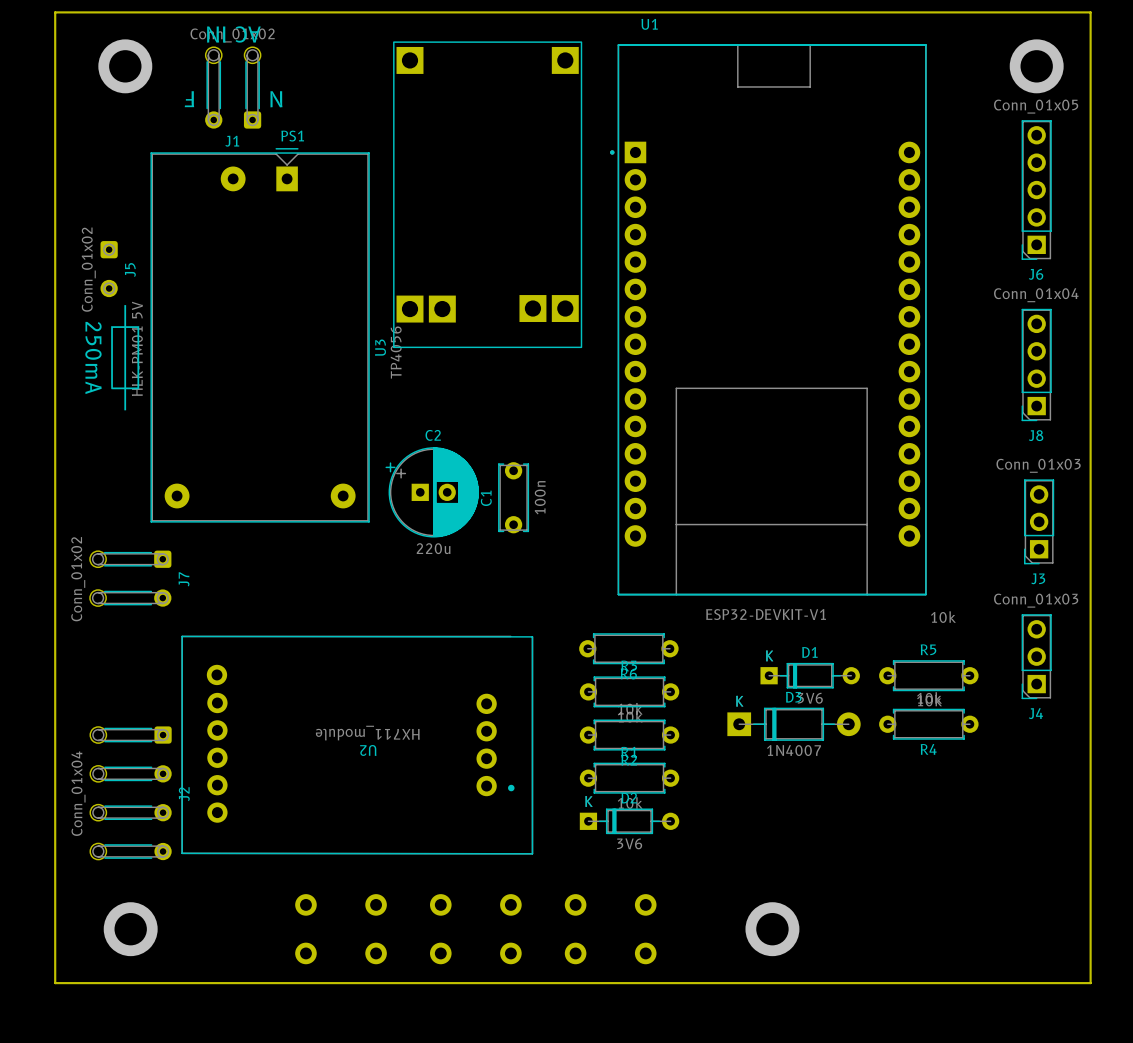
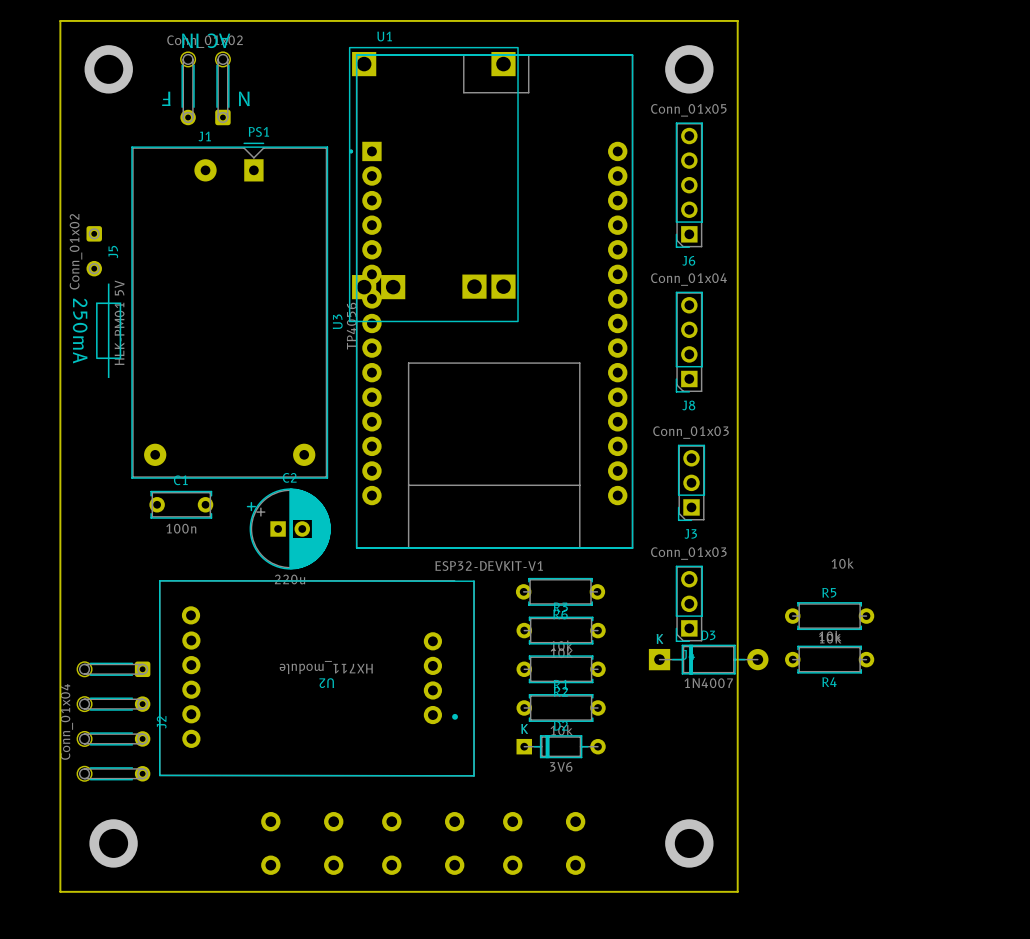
board edge: (71, 12) (55, 12) (55, 983) (71, 983) -> (60, 20) (60, 891)
board edge: (826, 12) (1090, 12) (1090, 983) (826, 983) -> (737, 20) (737, 891)
via: none -> (689, 69)
via: (1036, 66) -> none
J6 position: (1036, 190) -> (689, 185)
U1 position: (768, 319) -> (491, 301)
J8 position: (1036, 364) -> (689, 342)
C2 position: (432, 492) -> (288, 528)
C1 rotation: 0° (513, 497) -> 90° clockwise (181, 504)
C1 position: (513, 497) -> (181, 504)
J3 position: (1039, 521) -> (691, 482)
J7: Conn_01x02 (130, 578) -> none
J4 position: (1036, 656) -> (689, 603)
D1: 3V6 (810, 675) -> none

